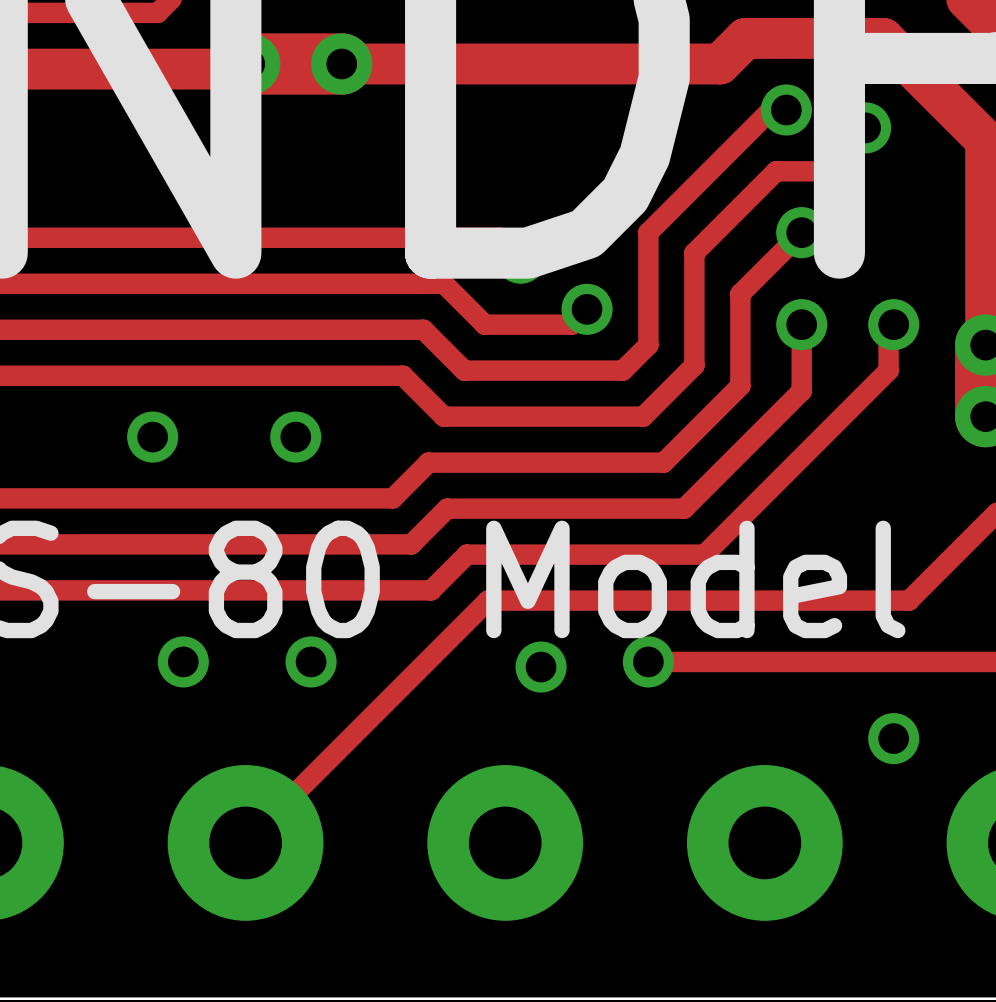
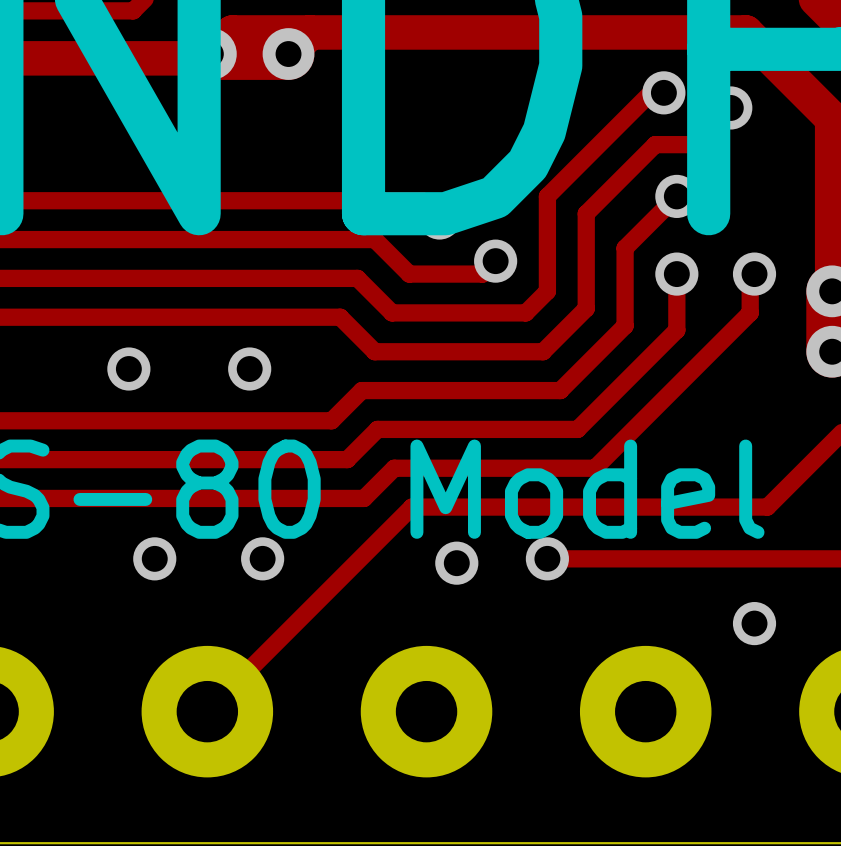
track: (745, 38) (719, 63) (341, 63) -> (629, 32) (232, 32) (210, 54)

